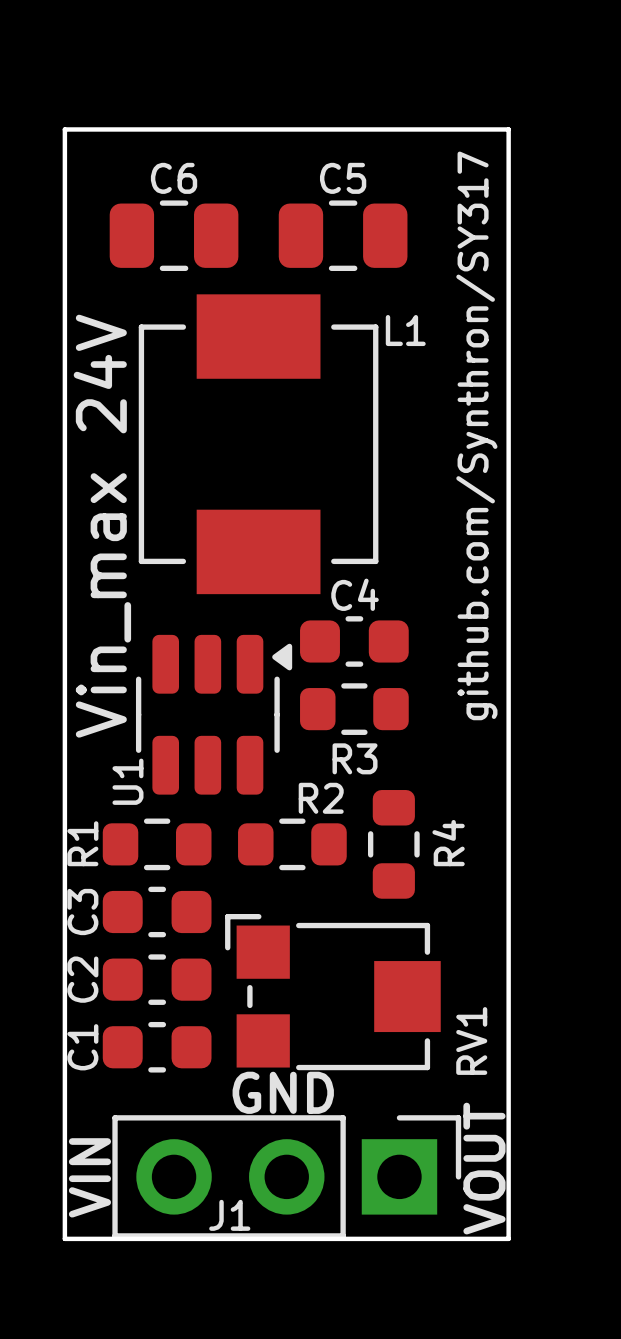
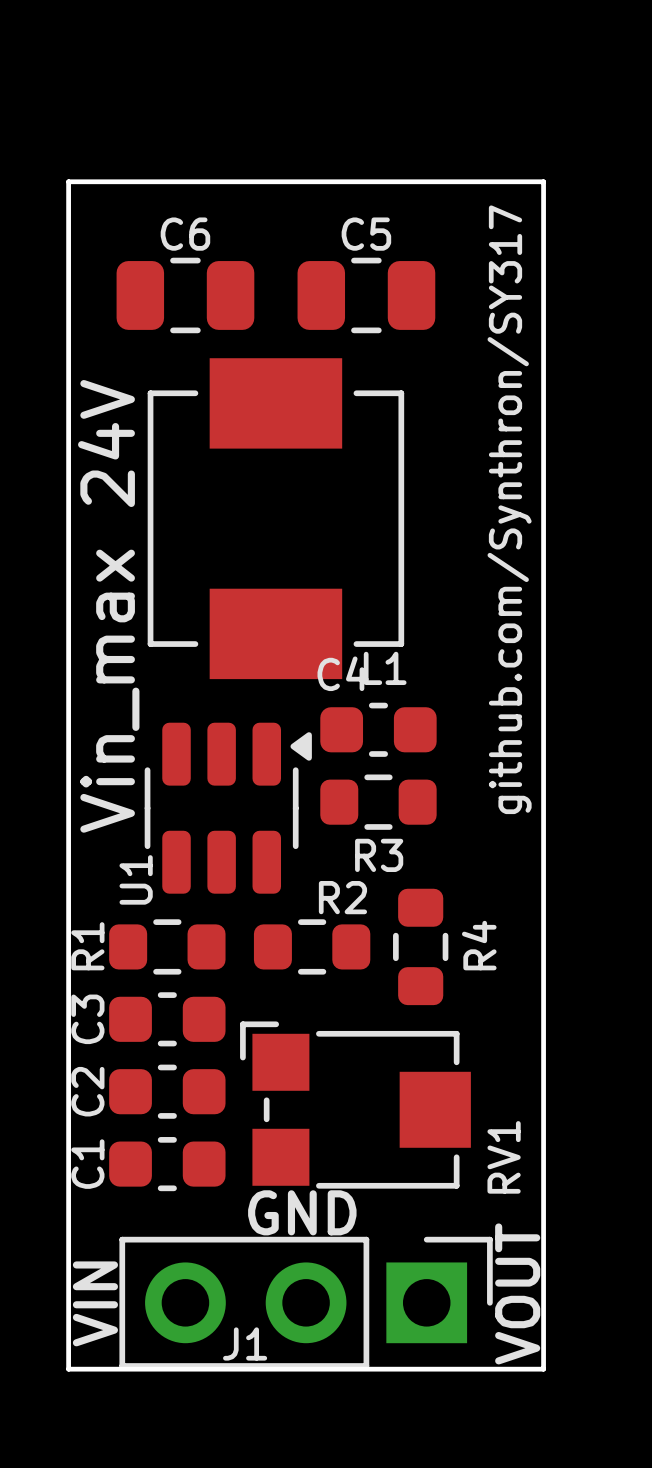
L1 name position: L1 (405, 330) -> L1 (385, 668)
C4 name position: C4 (355, 594) -> C4 (342, 673)

